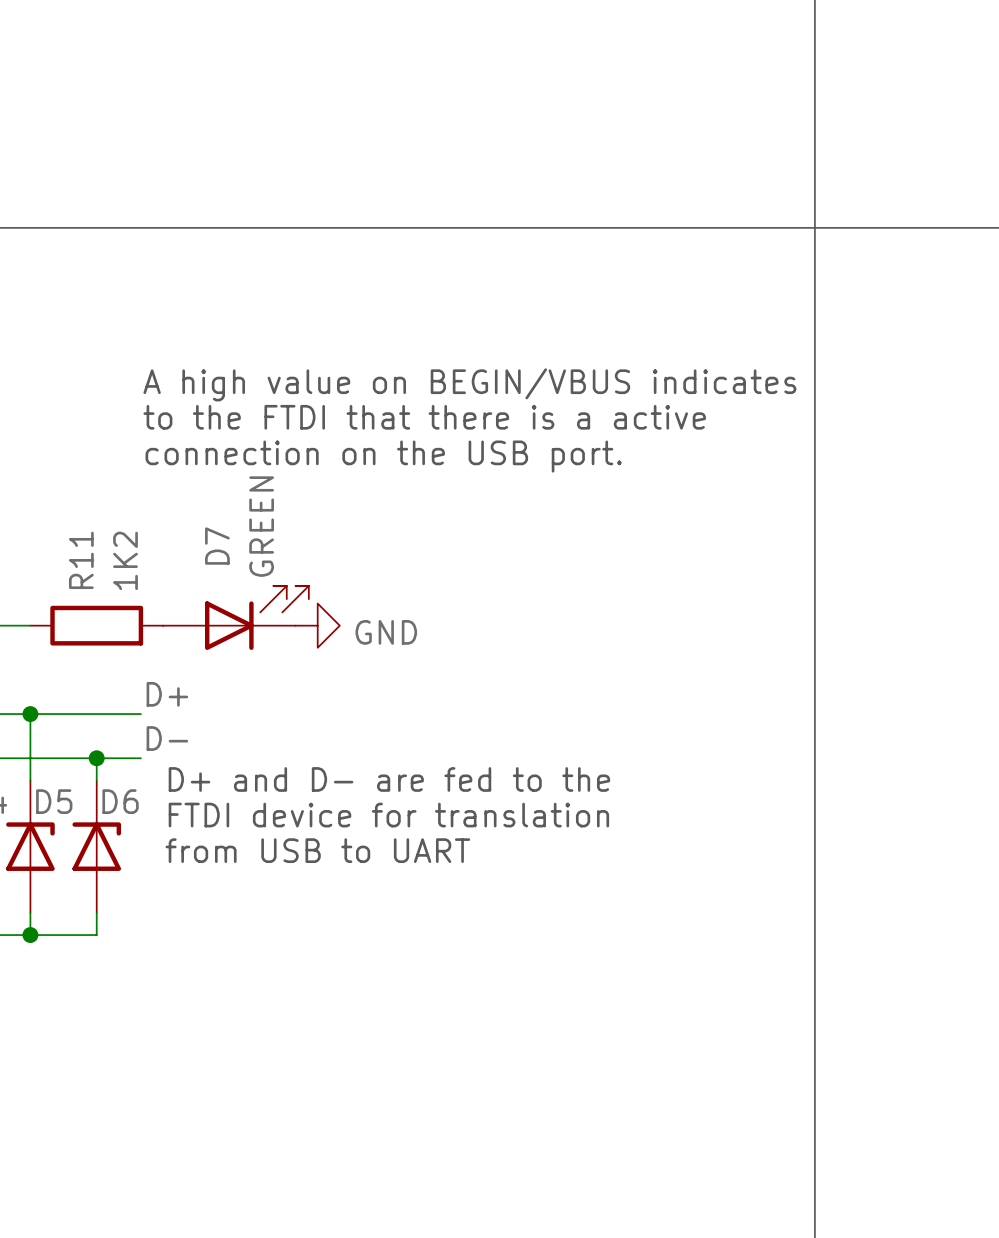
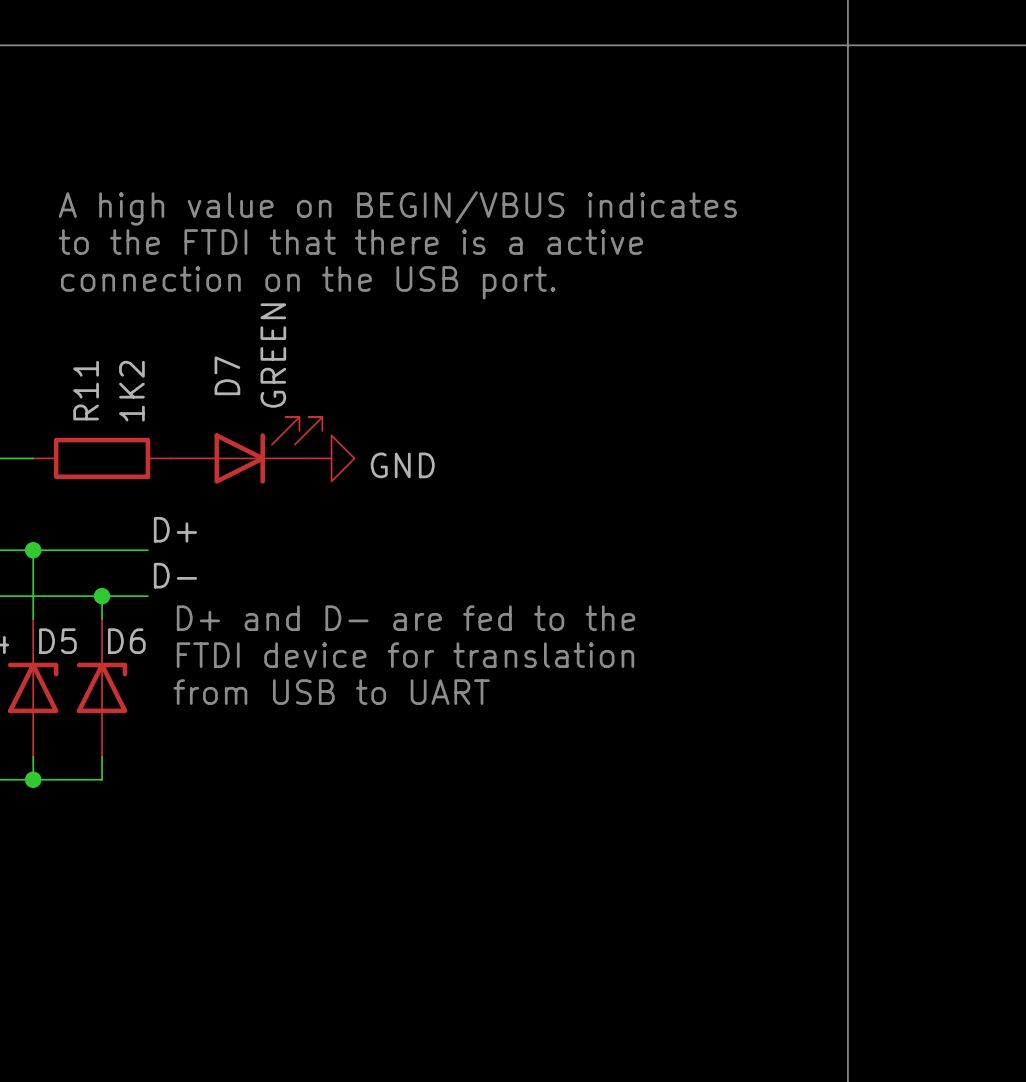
text position: A high value on BEGIN/VBUS indicates (469, 384) -> A high value on BEGIN/VBUS indicates (397, 208)
text position: to the FTDI that there is a active (424, 417) -> to the FTDI that there is a active (350, 242)
text position: connection on the USB port. (383, 456) -> connection on the USB port. (308, 282)

